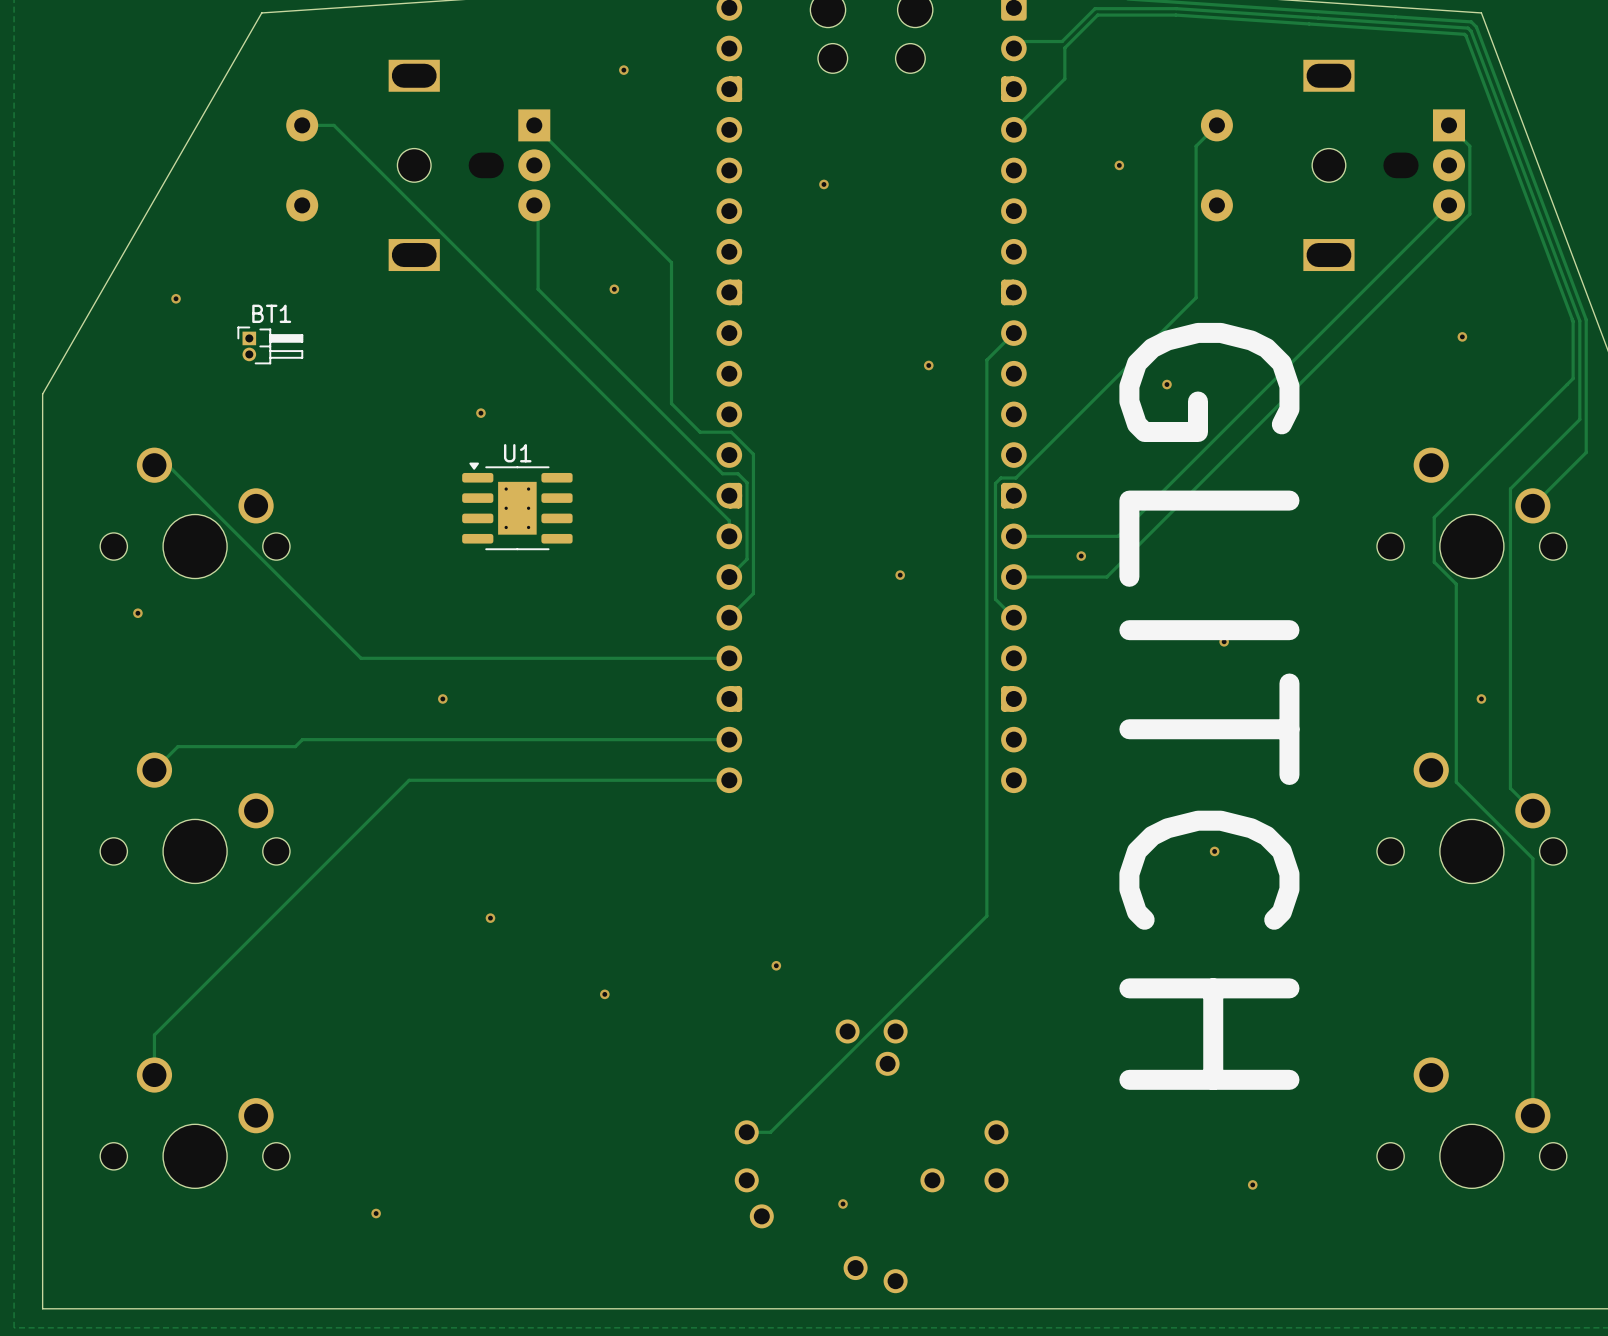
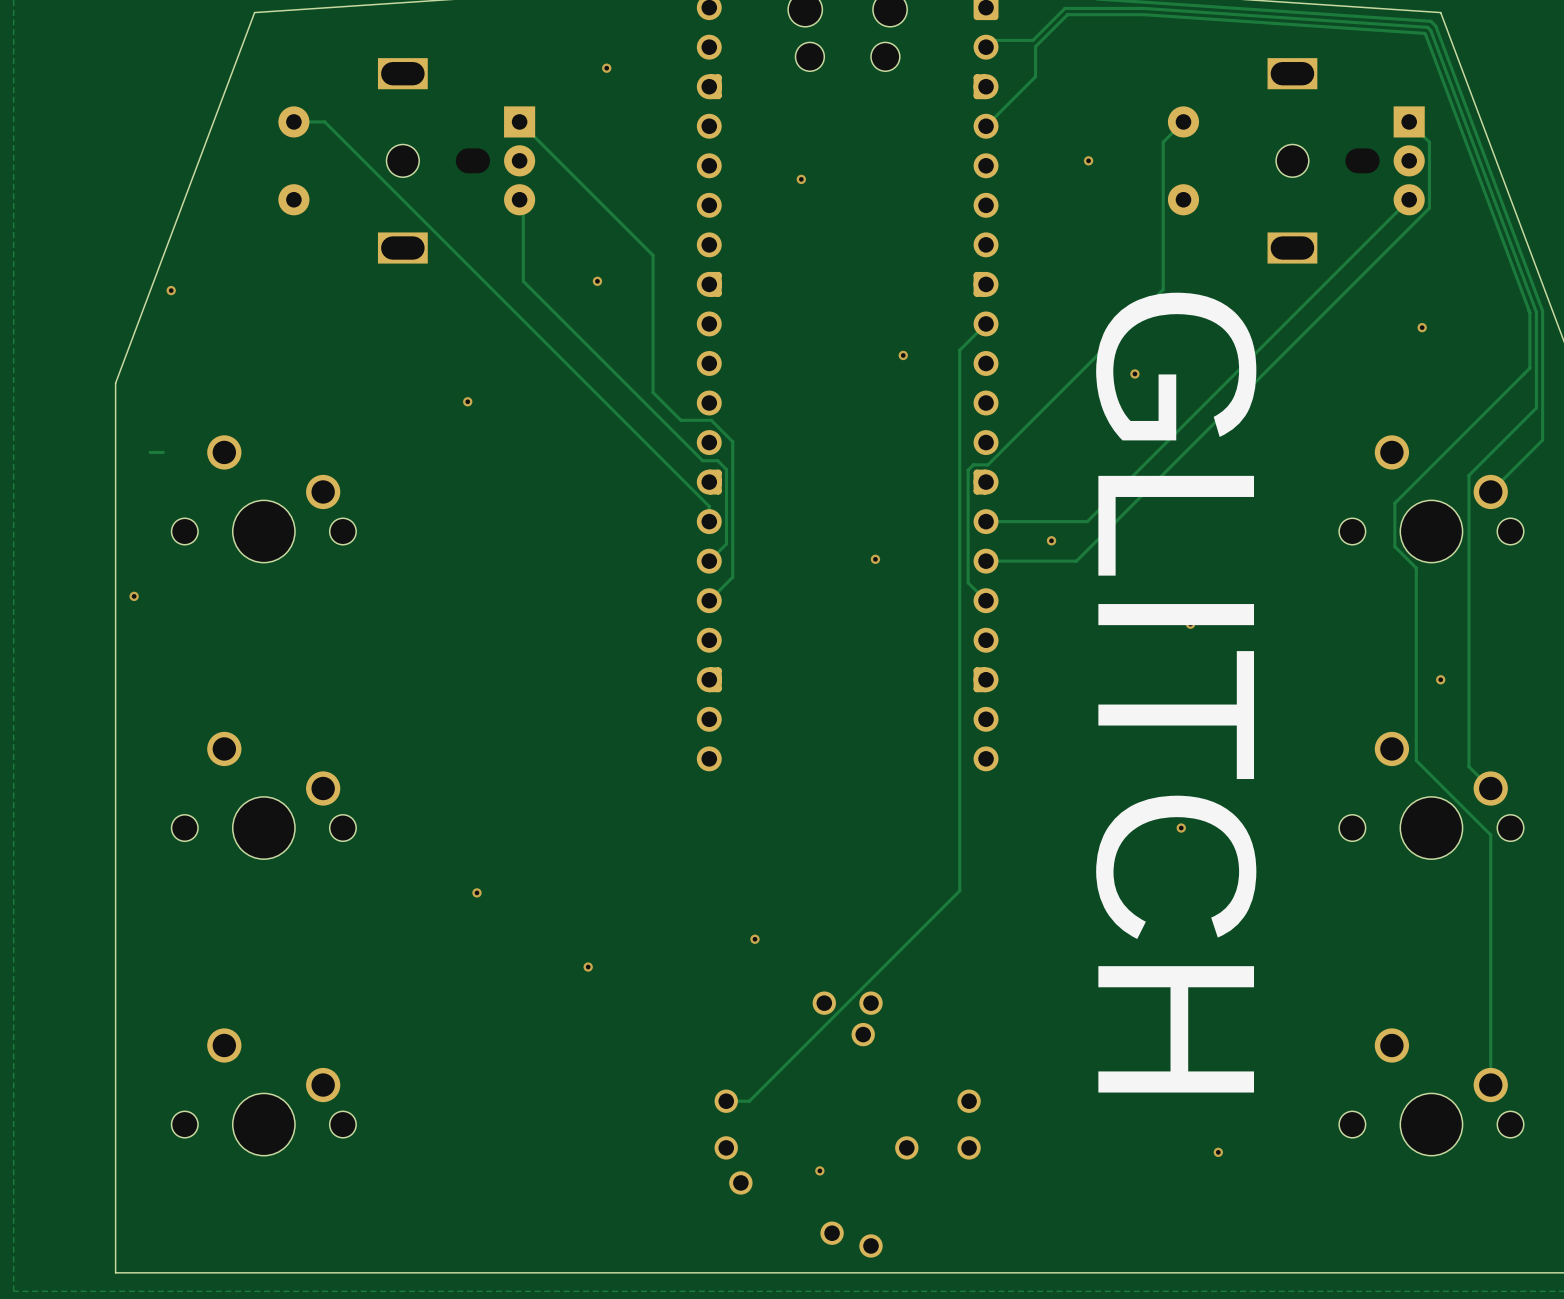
board edge: (261, 12) (42, 394) (42, 1308) (118, 1308) -> (254, 12) (115, 383) (115, 1272)
BT1: (270, 345) -> none
track: (167, 465) (361, 658) (729, 658) -> none
U1: (517, 506) -> none
part position: (195, 513) -> (263, 498)
via: (442, 698) -> none
track: (729, 739) (302, 739) (295, 746) (177, 746) (154, 770) -> none
track: (729, 780) (409, 780) (154, 1035) (154, 1075) -> none
part position: (195, 817) -> (263, 795)
part position: (195, 1122) -> (263, 1092)
via: (376, 1213) -> none

